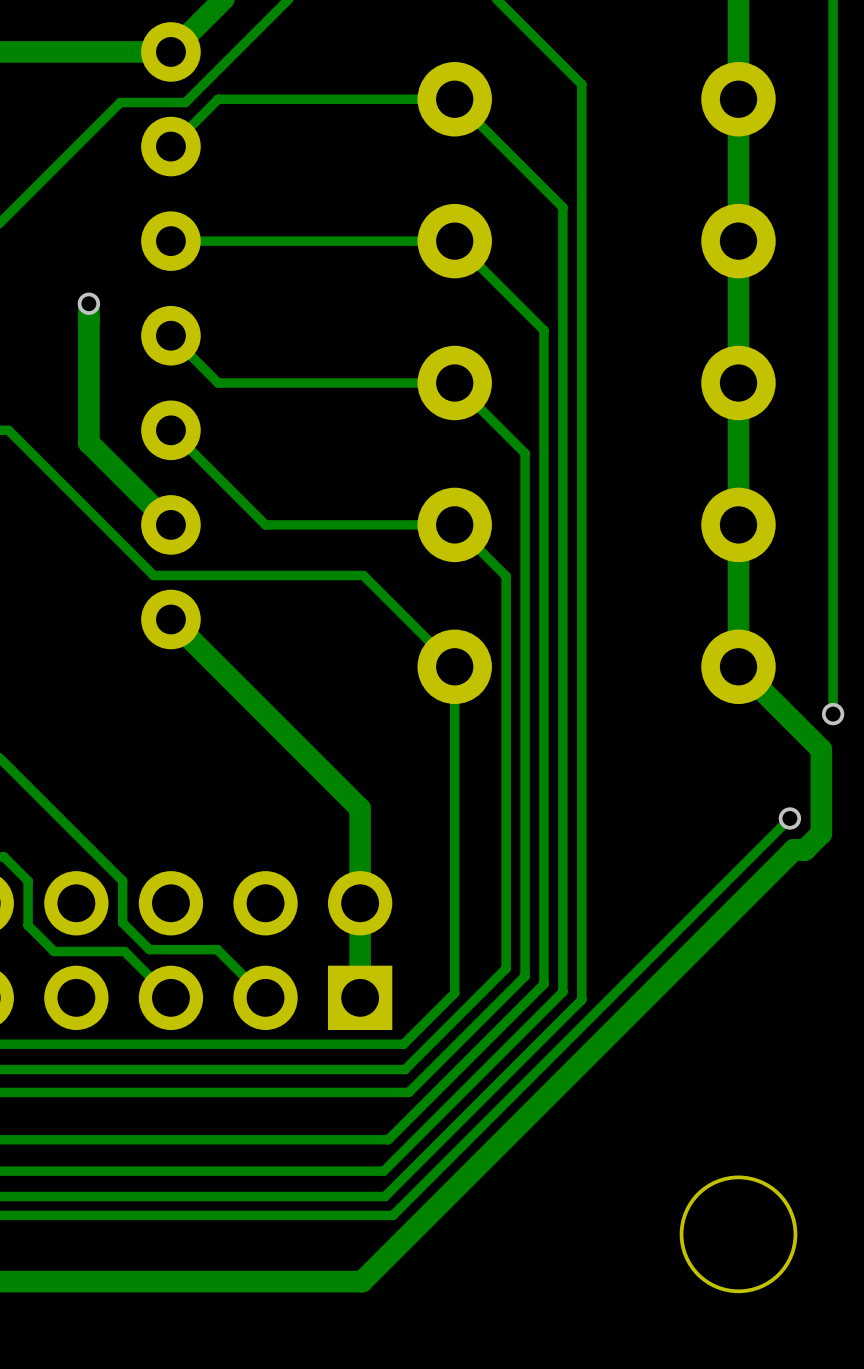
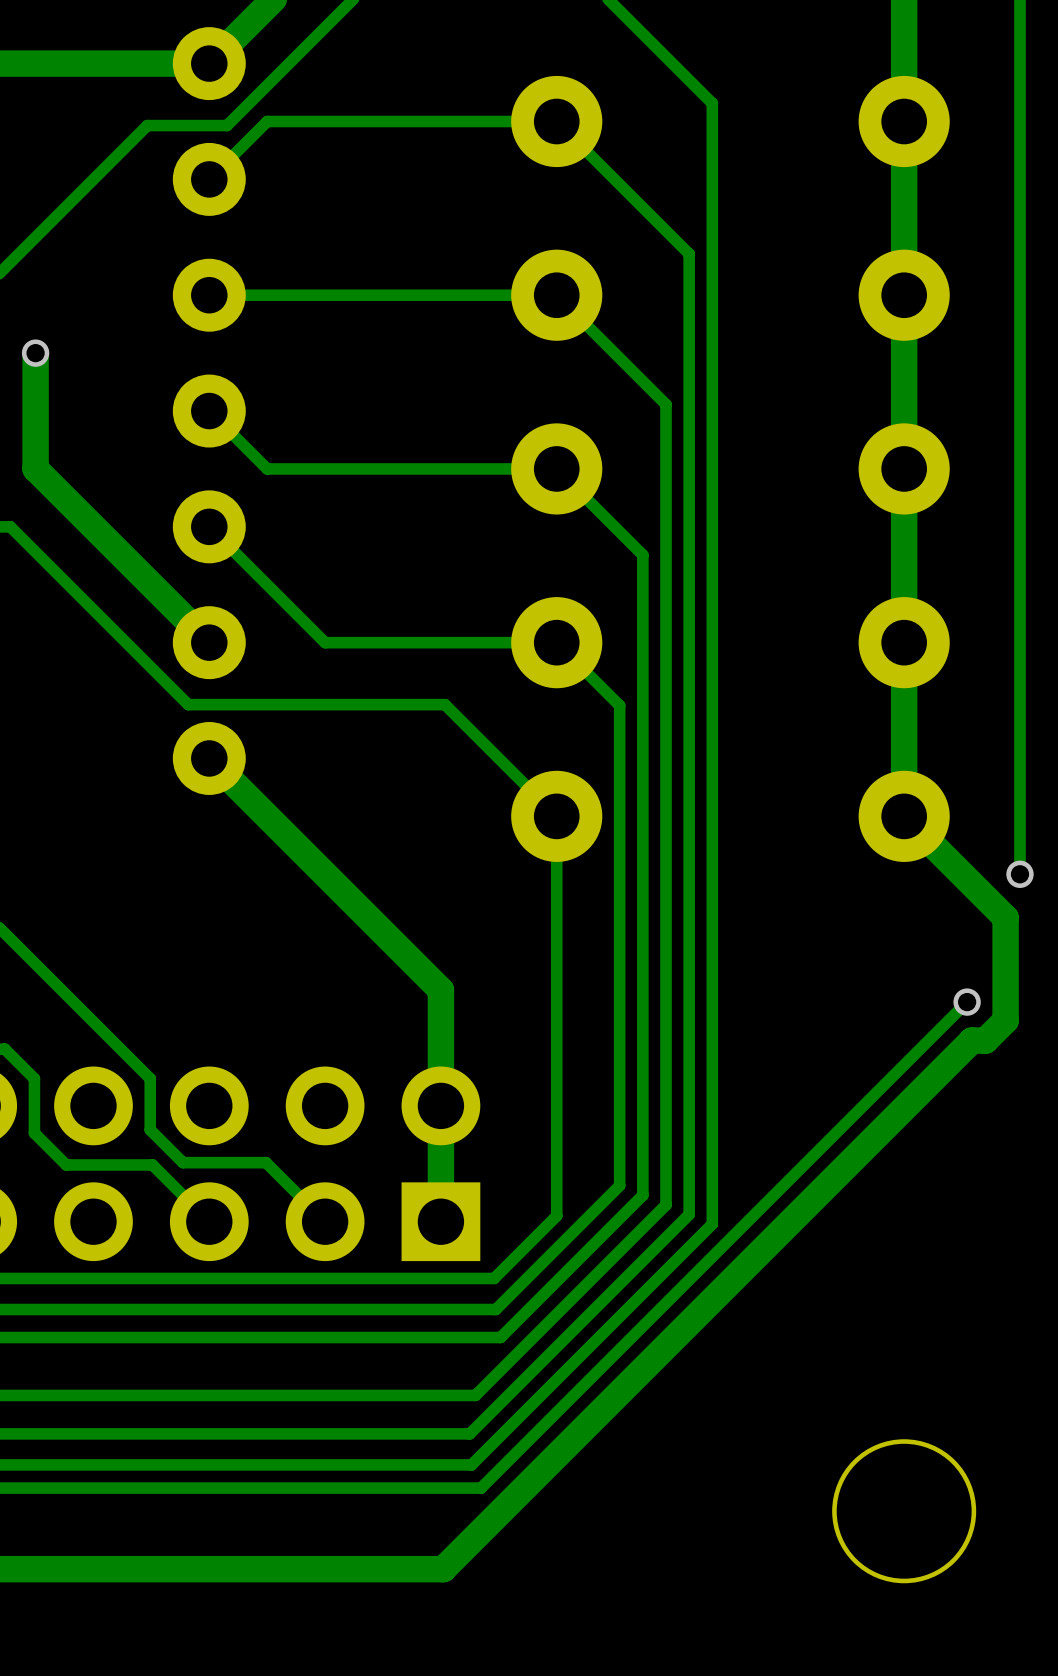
track: (88, 303) (88, 442) -> (35, 353) (35, 468) (108, 542)
via position: (88, 303) -> (35, 353)

